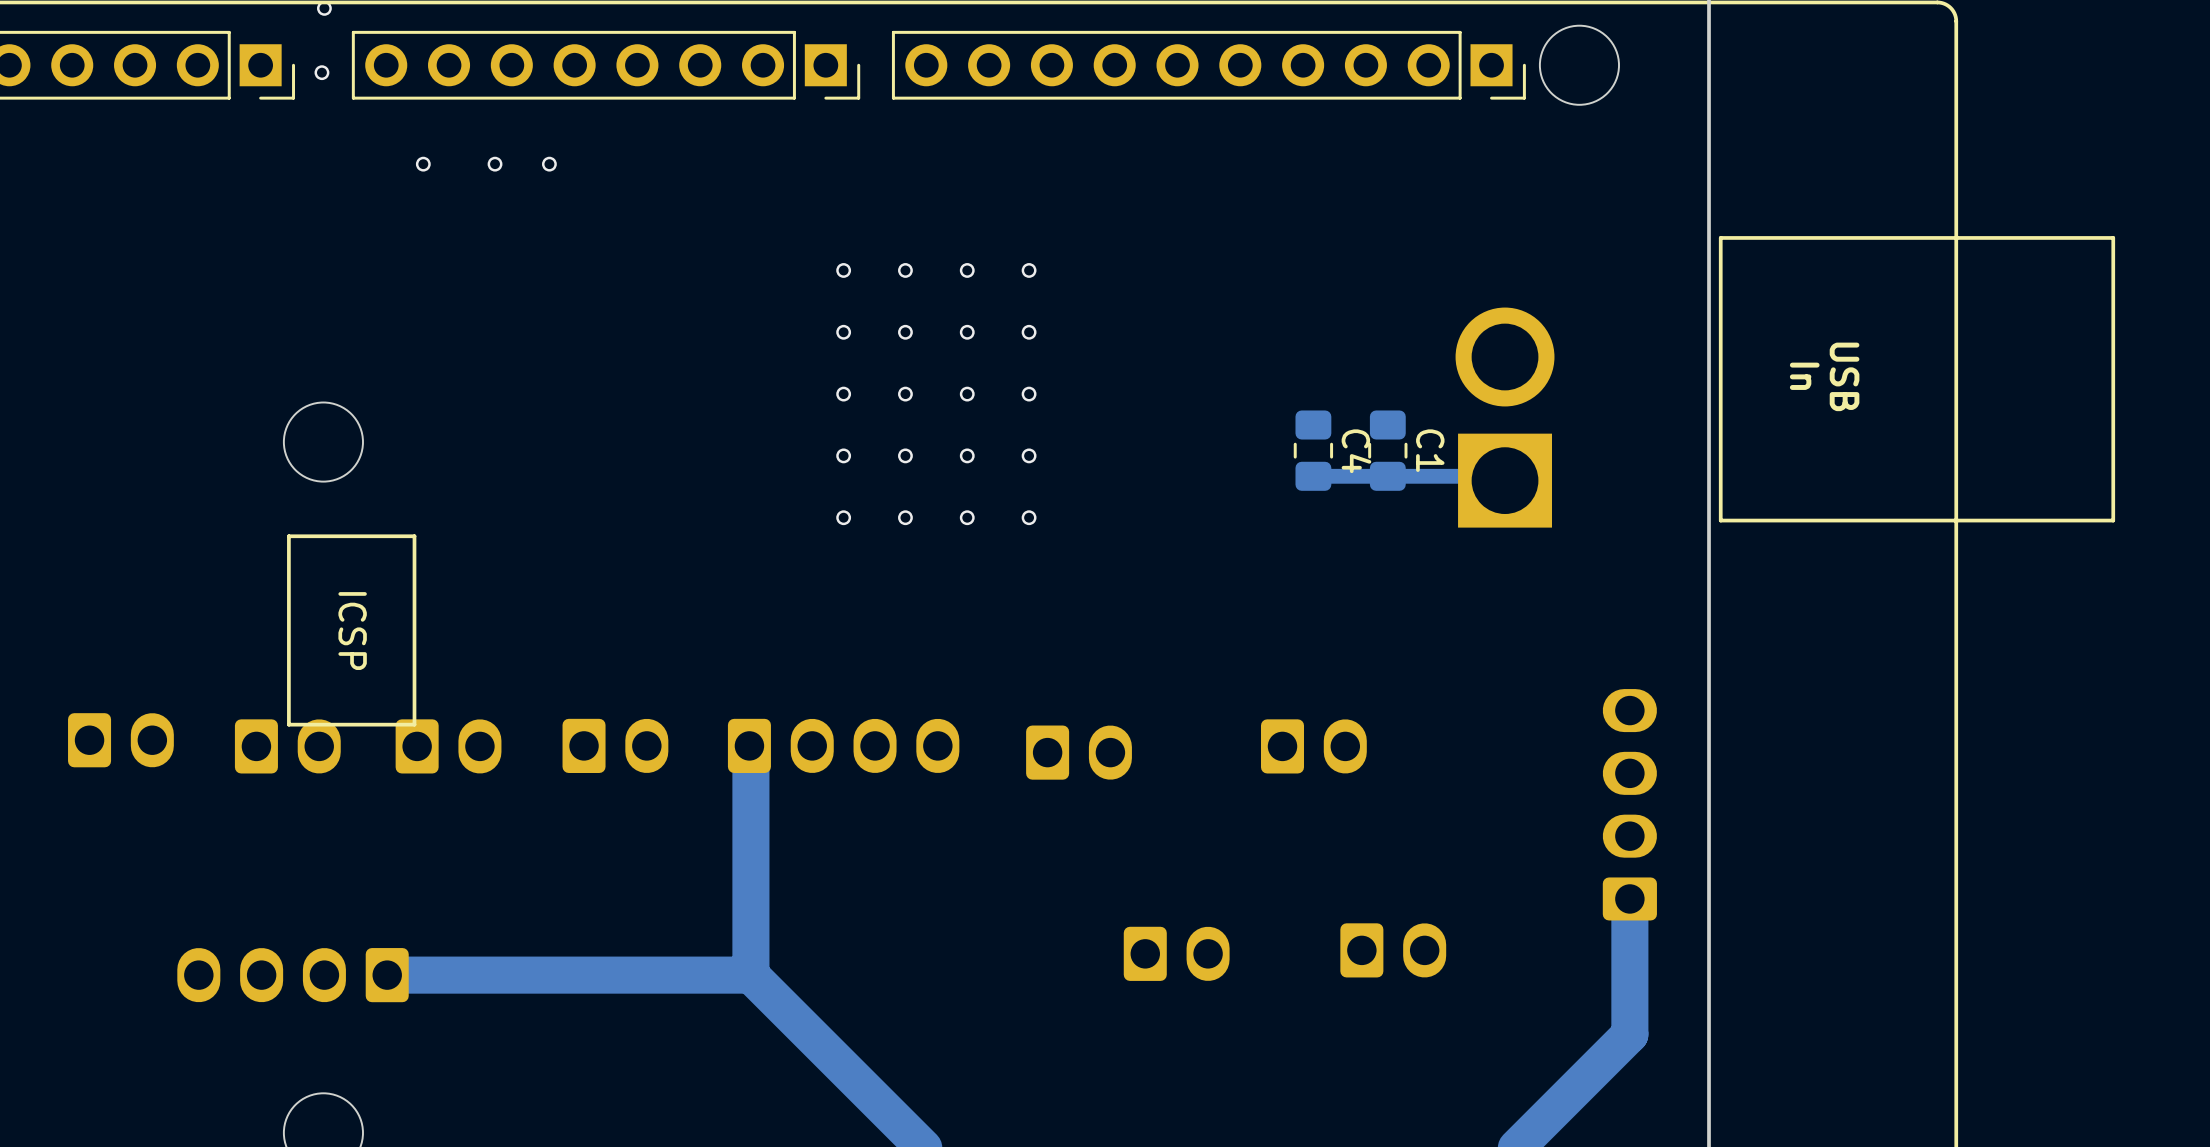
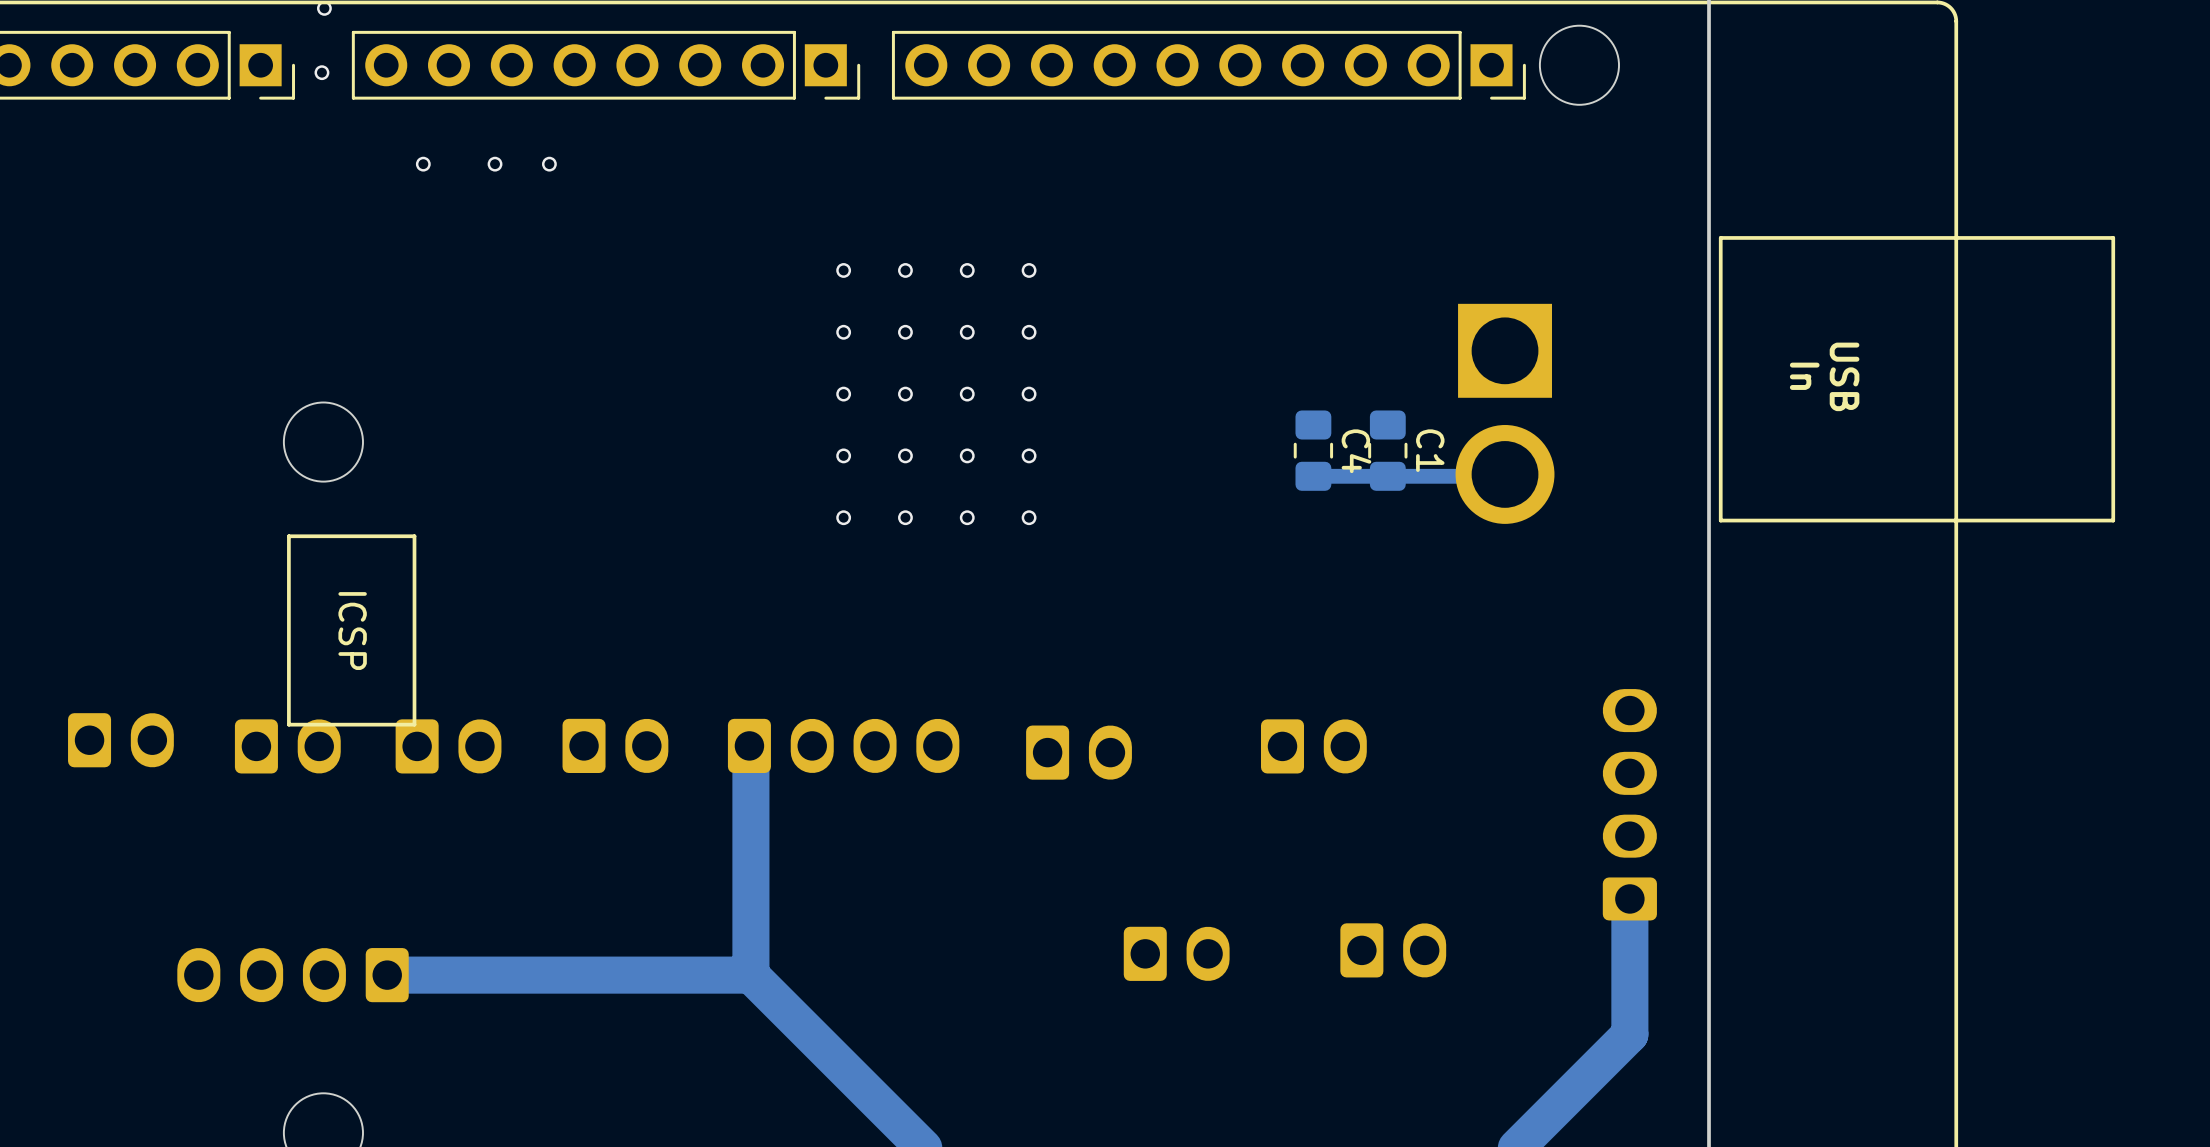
part rotation: 0° (1505, 417) -> 180° (1505, 413)

